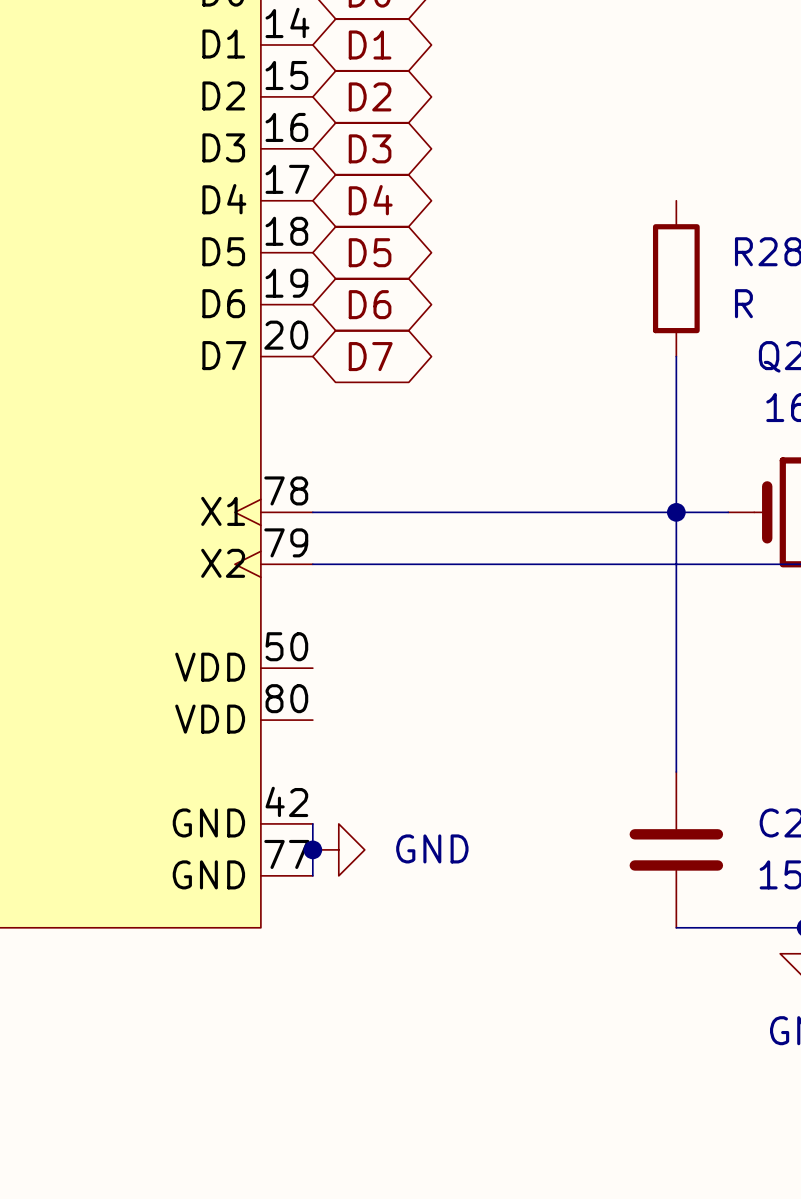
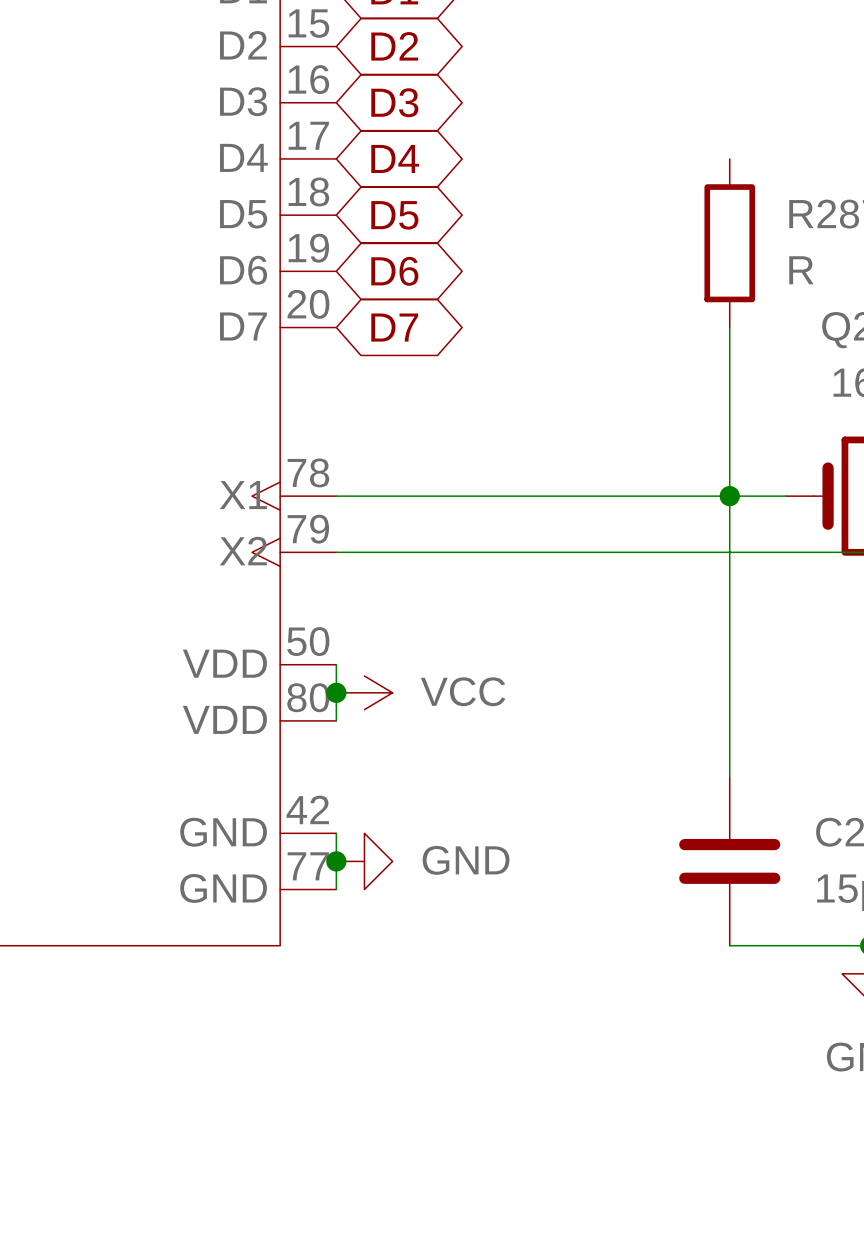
wire: none -> (336, 664) (336, 720)
junction: none -> (336, 692)
power symbol: none -> VCC (364, 692)

